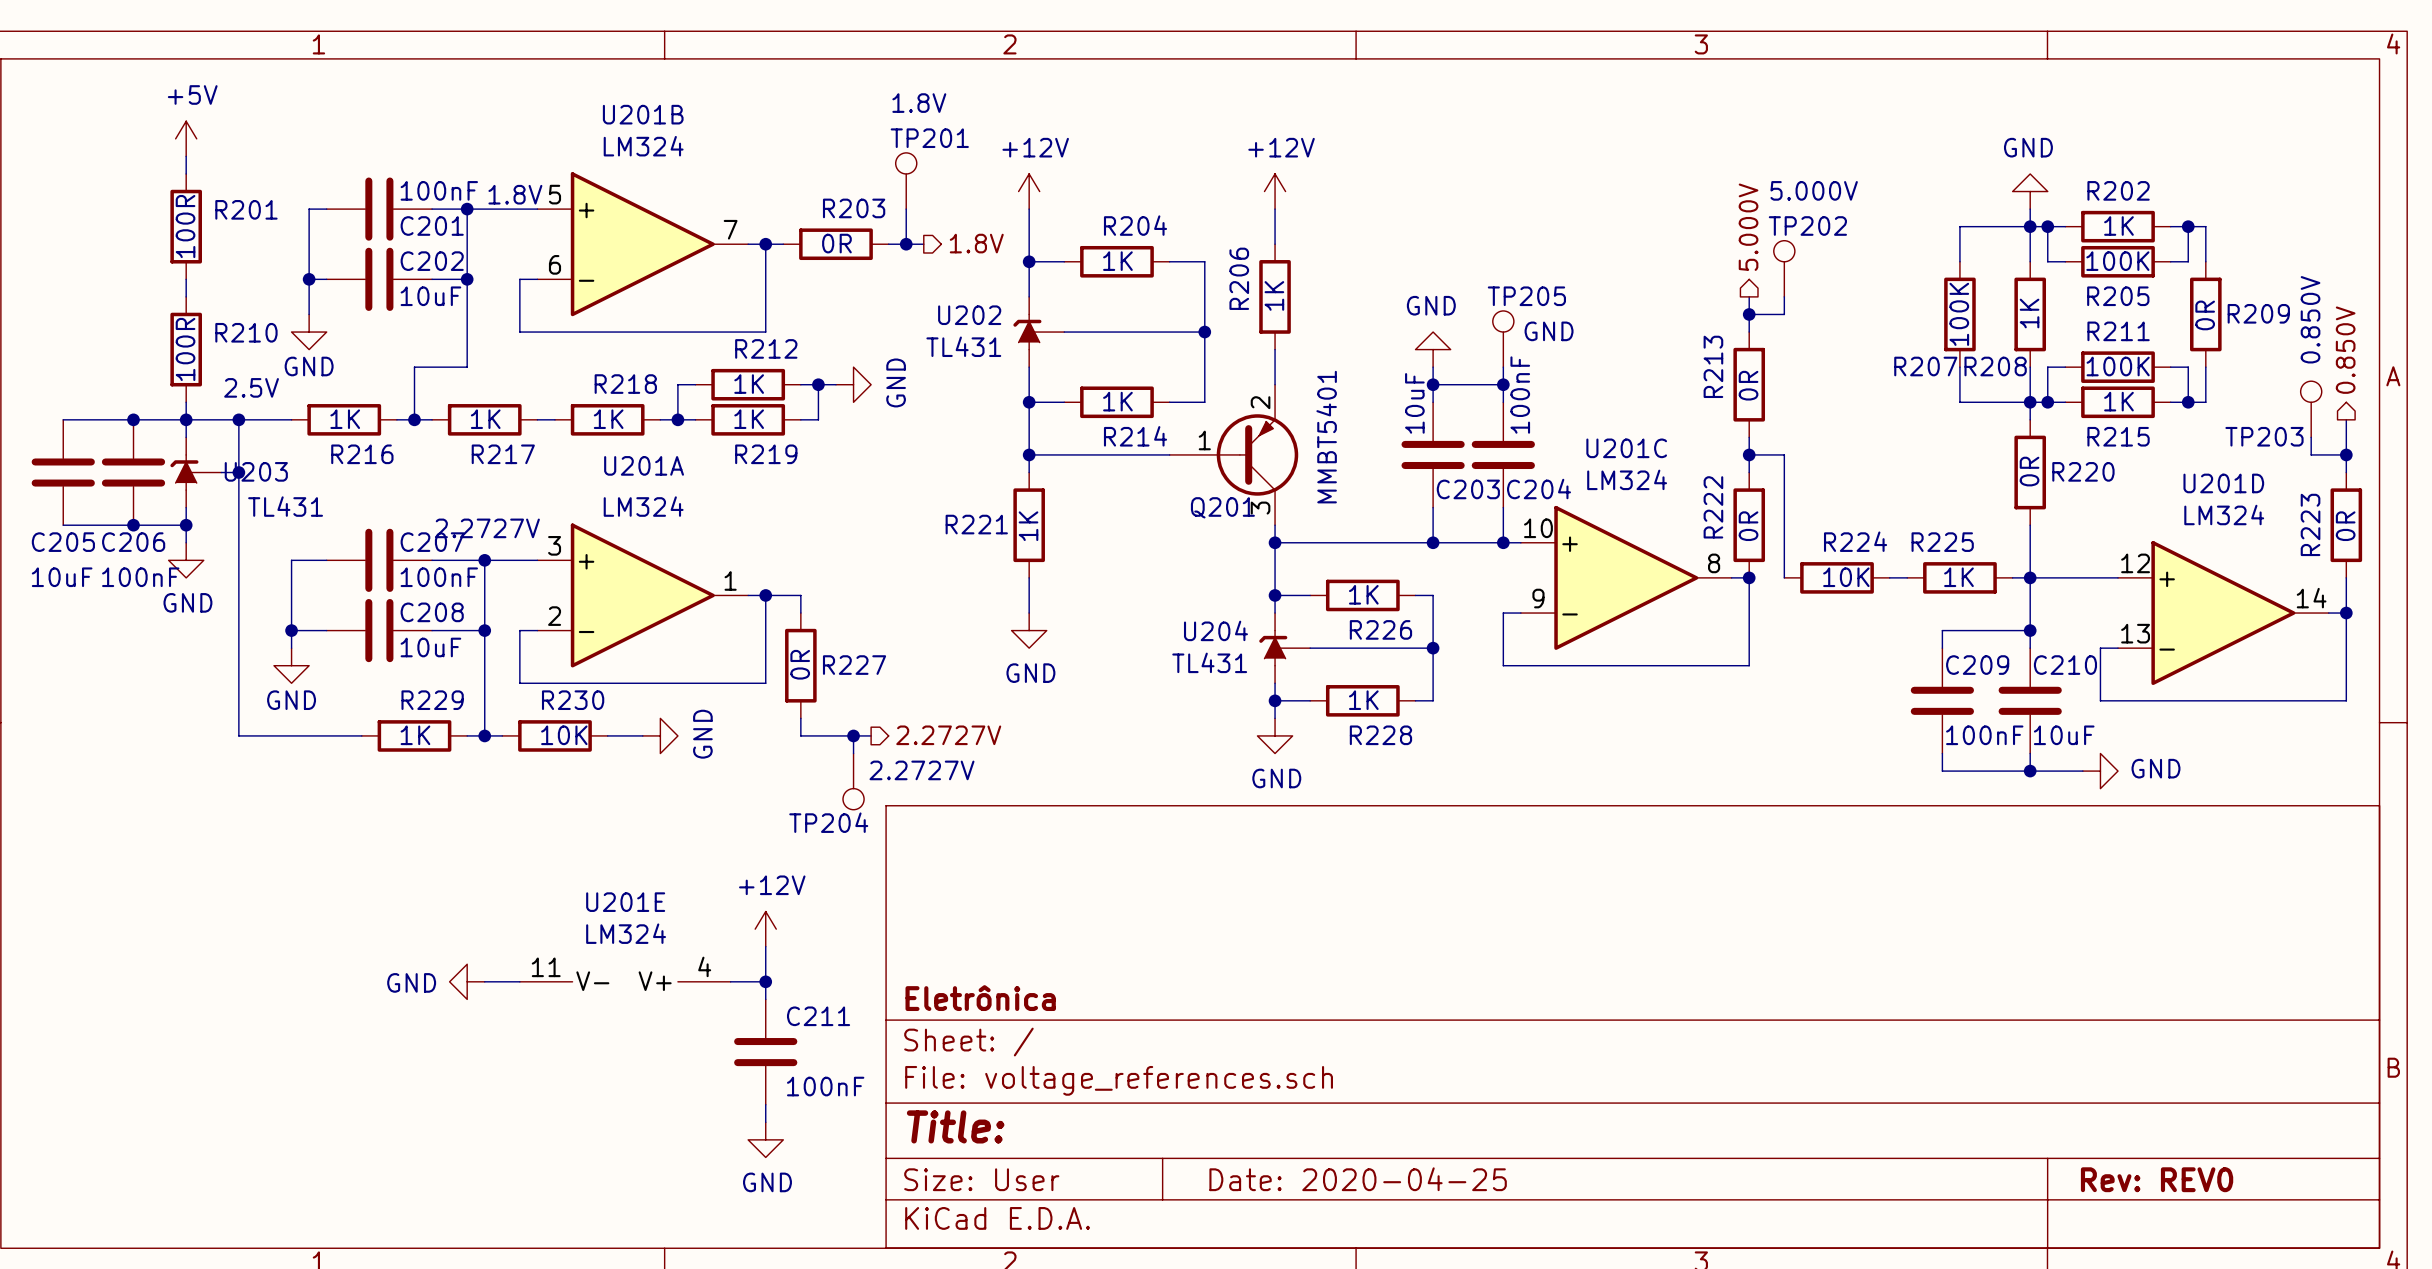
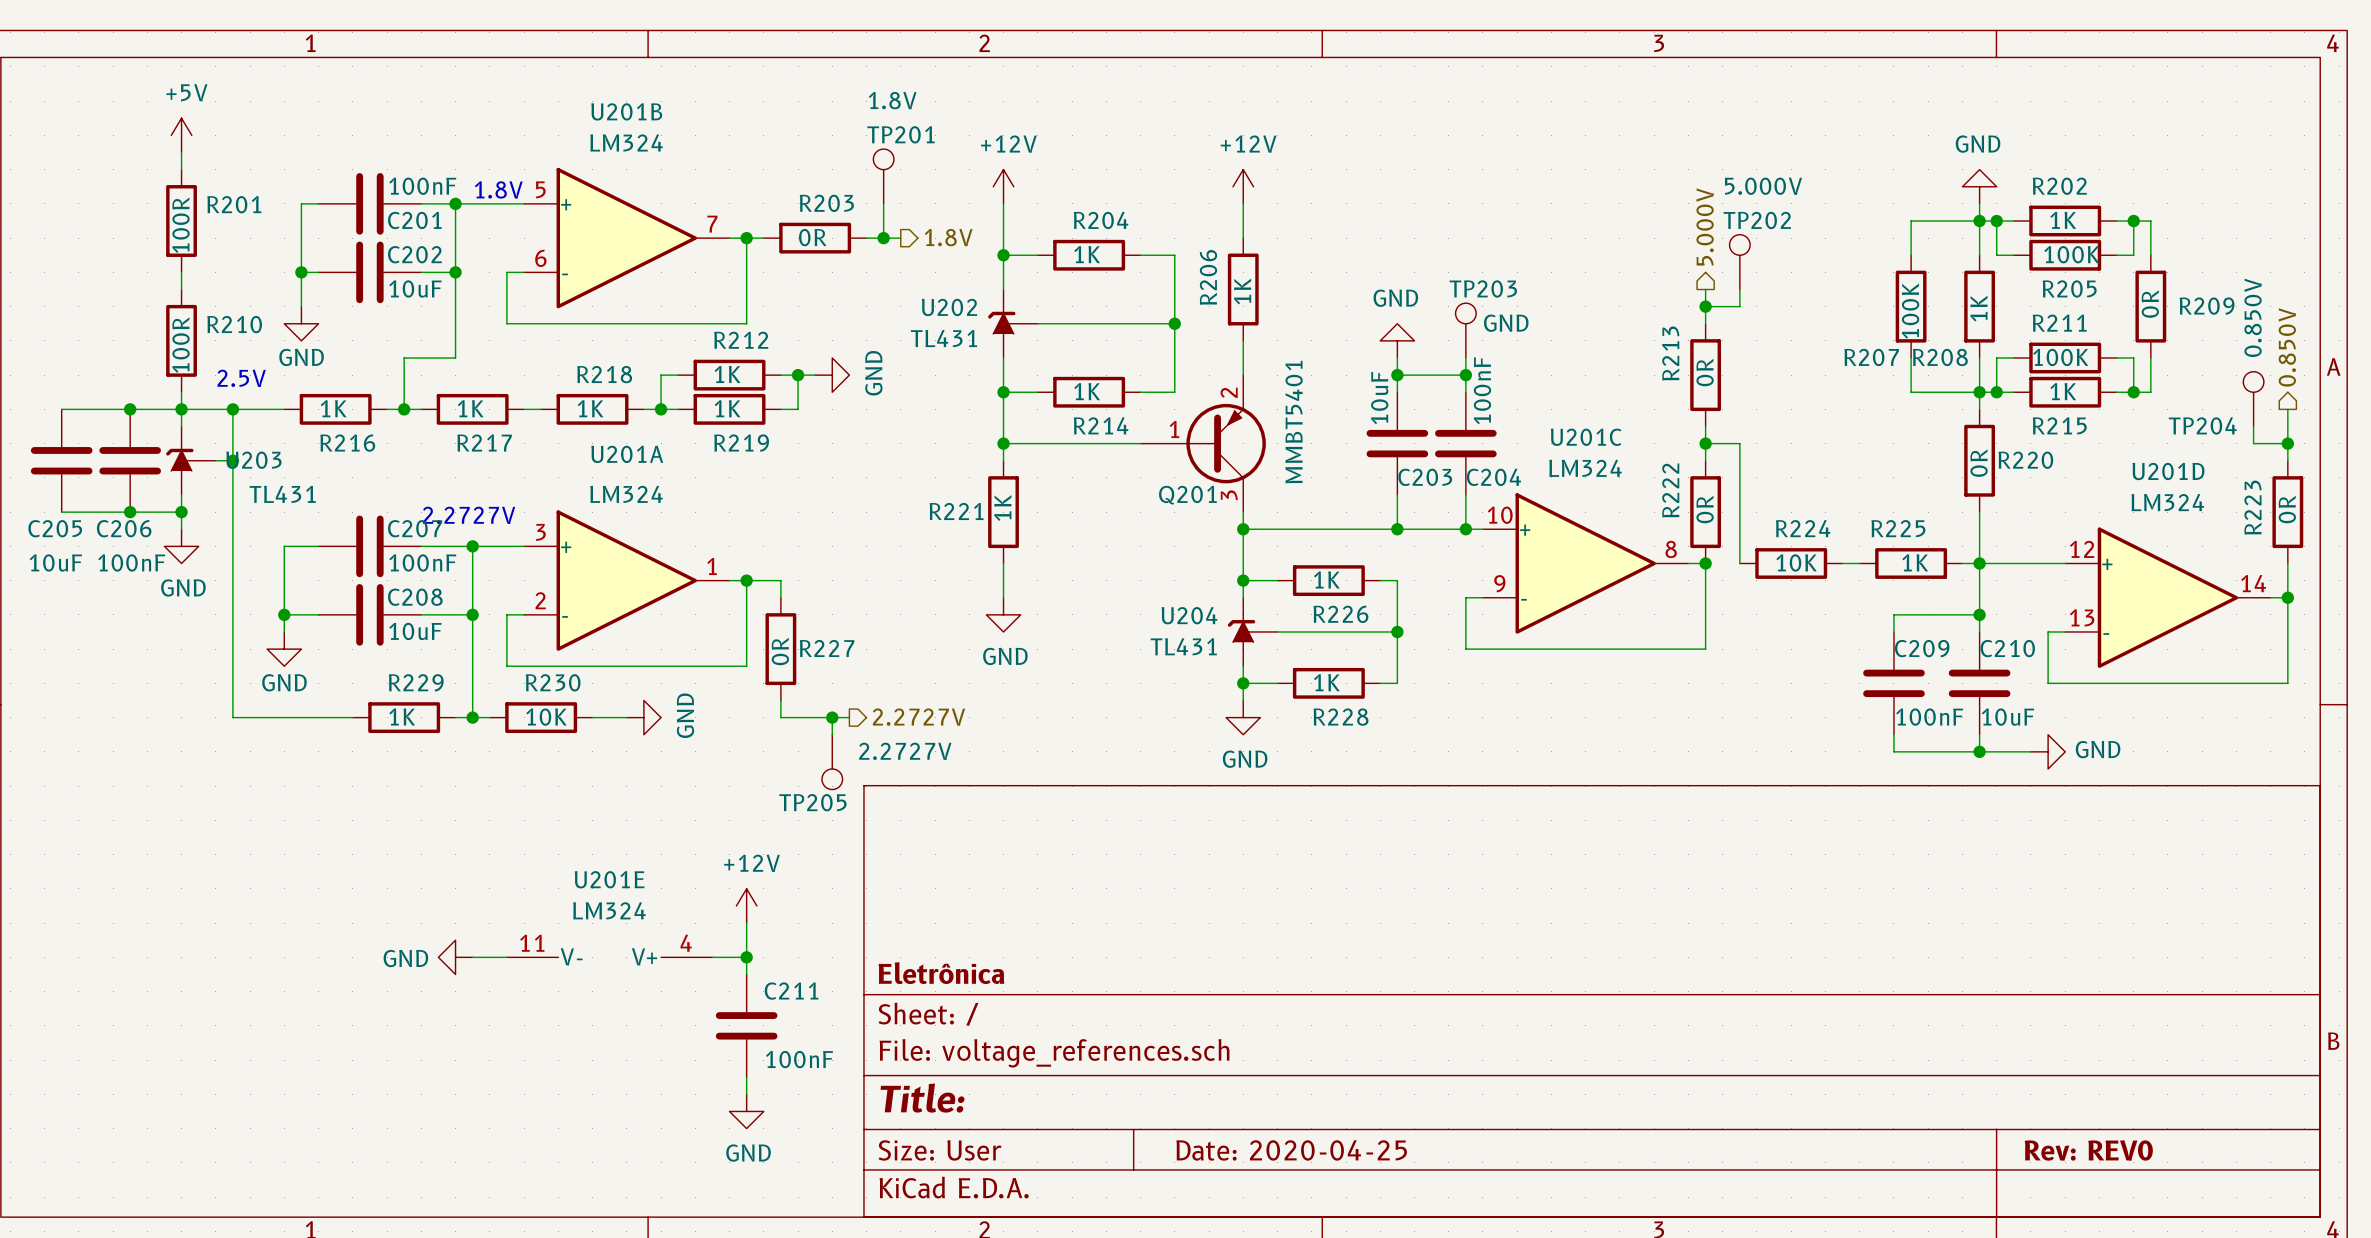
TP205 name: TP205 (1526, 296) -> TP203 (1483, 288)
TP203 name: TP203 (2264, 436) -> TP204 (2202, 425)
TP204 name: TP204 (828, 822) -> TP205 (812, 802)

